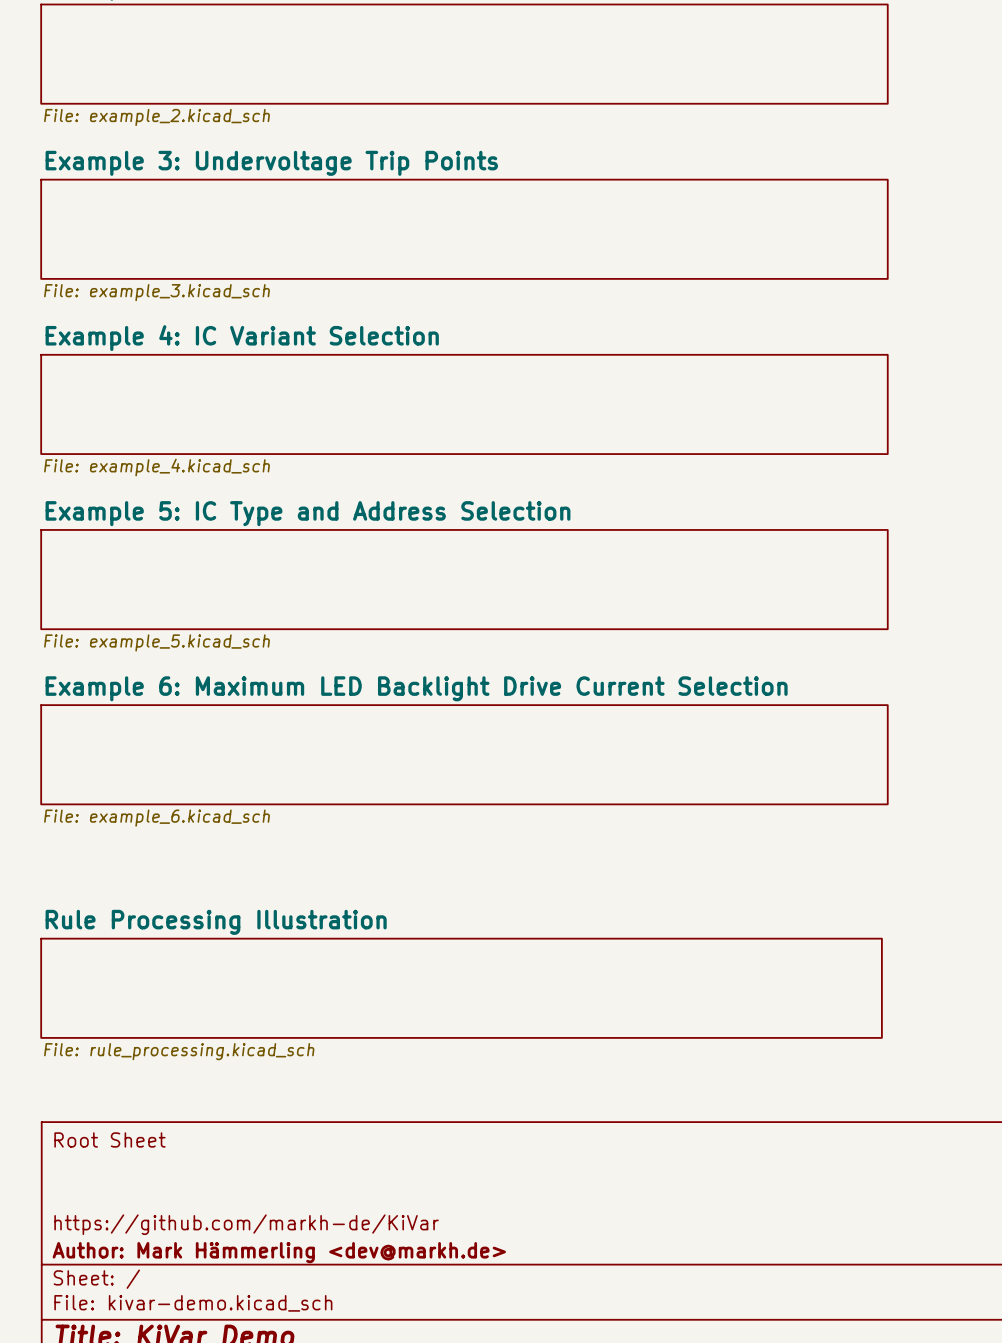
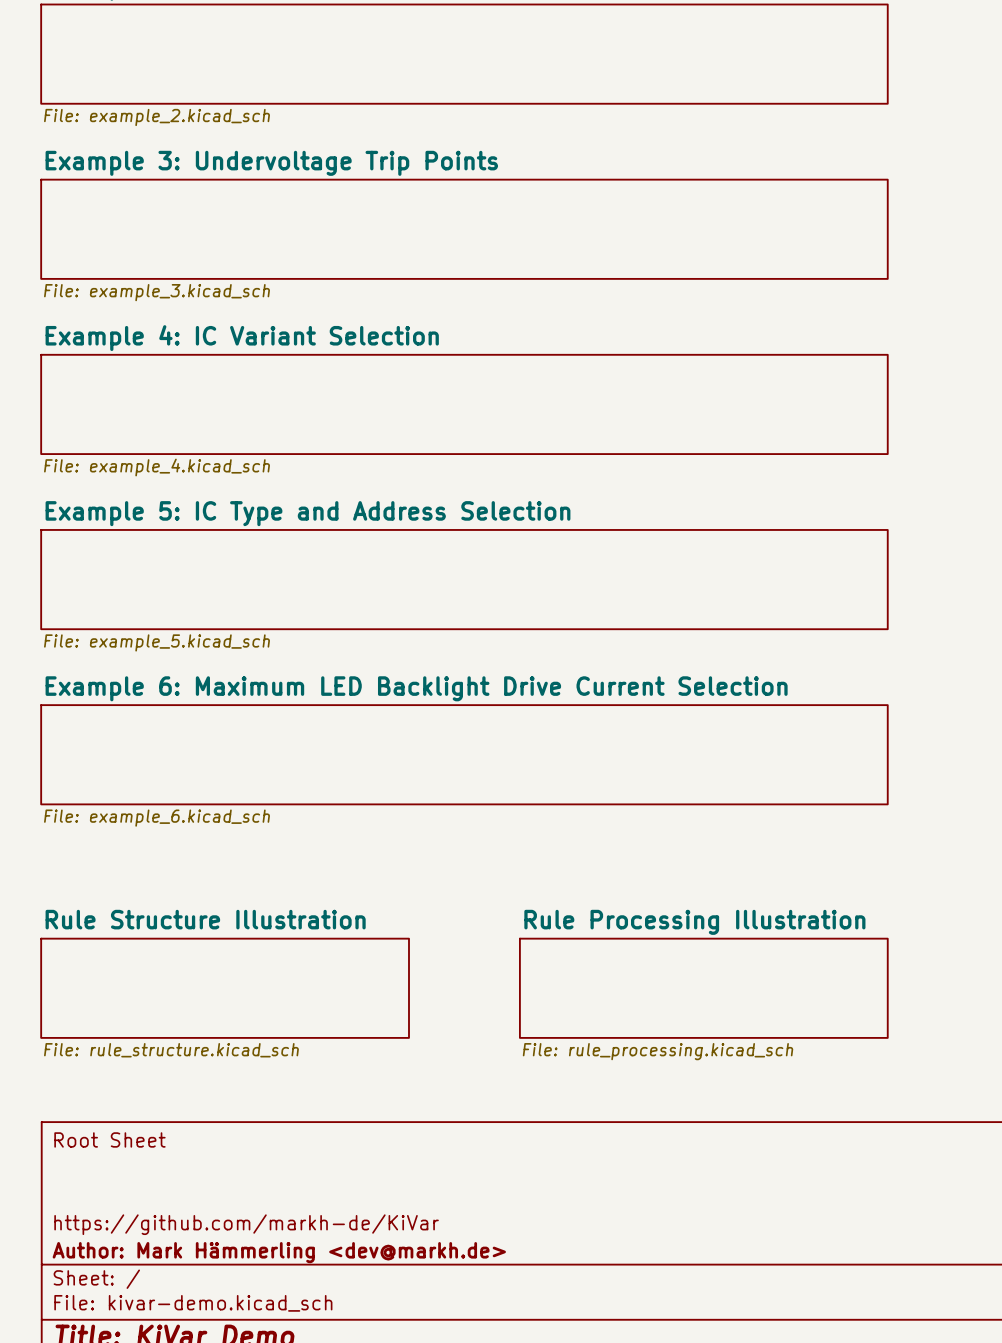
sheet Rule Structure Illustration: none -> File: rule_structure.kicad_sch (225, 988)
sheet Rule Processing Illustration: File: rule_processing.kicad_sch (461, 988) -> none
sheet Rule Processing Illustration: none -> File: rule_processing.kicad_sch (703, 988)

